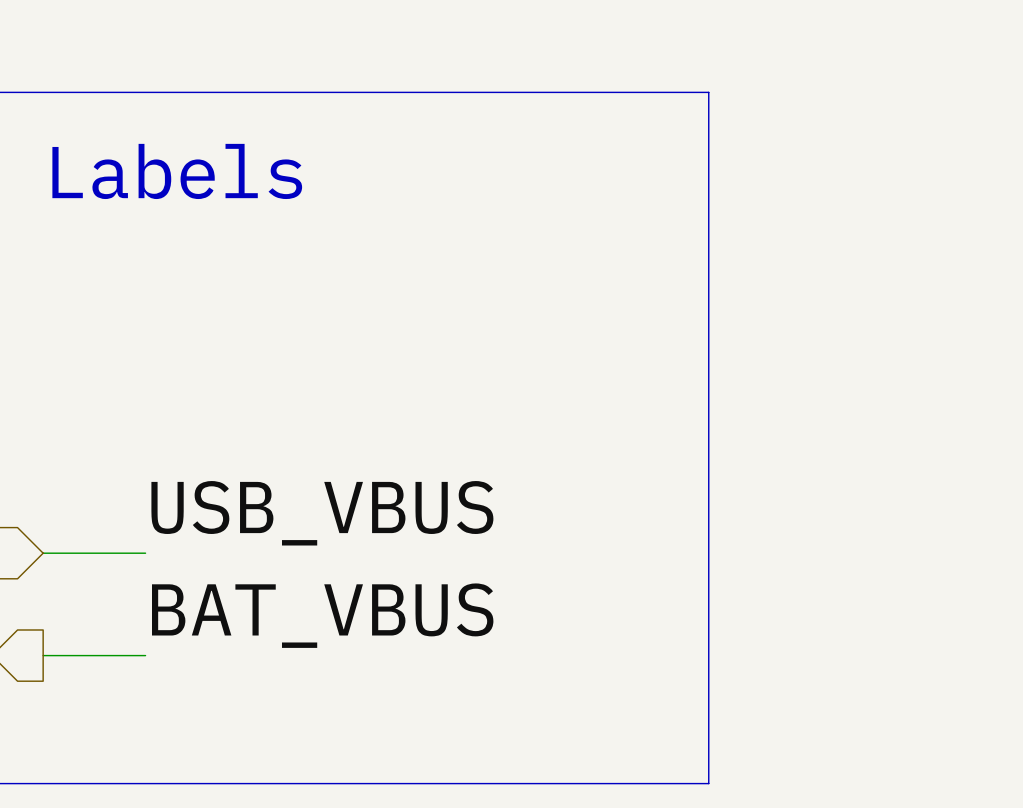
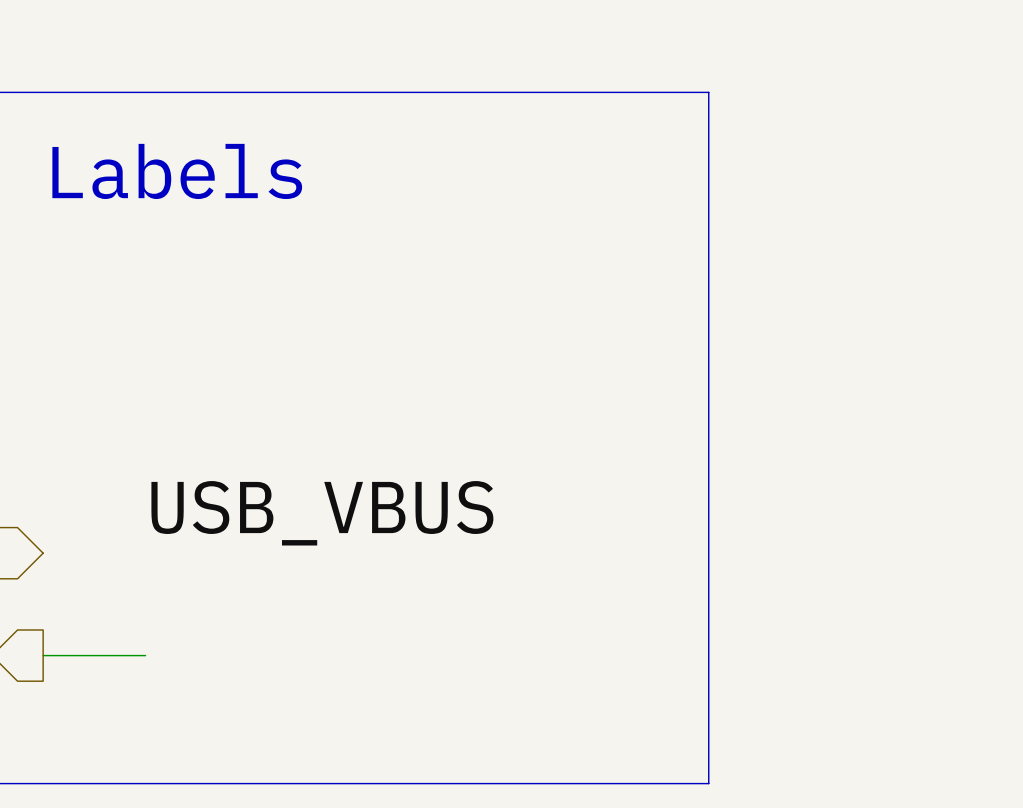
wire: (43, 553) (145, 553) -> none
label: BAT_VBUS (322, 615) -> none

